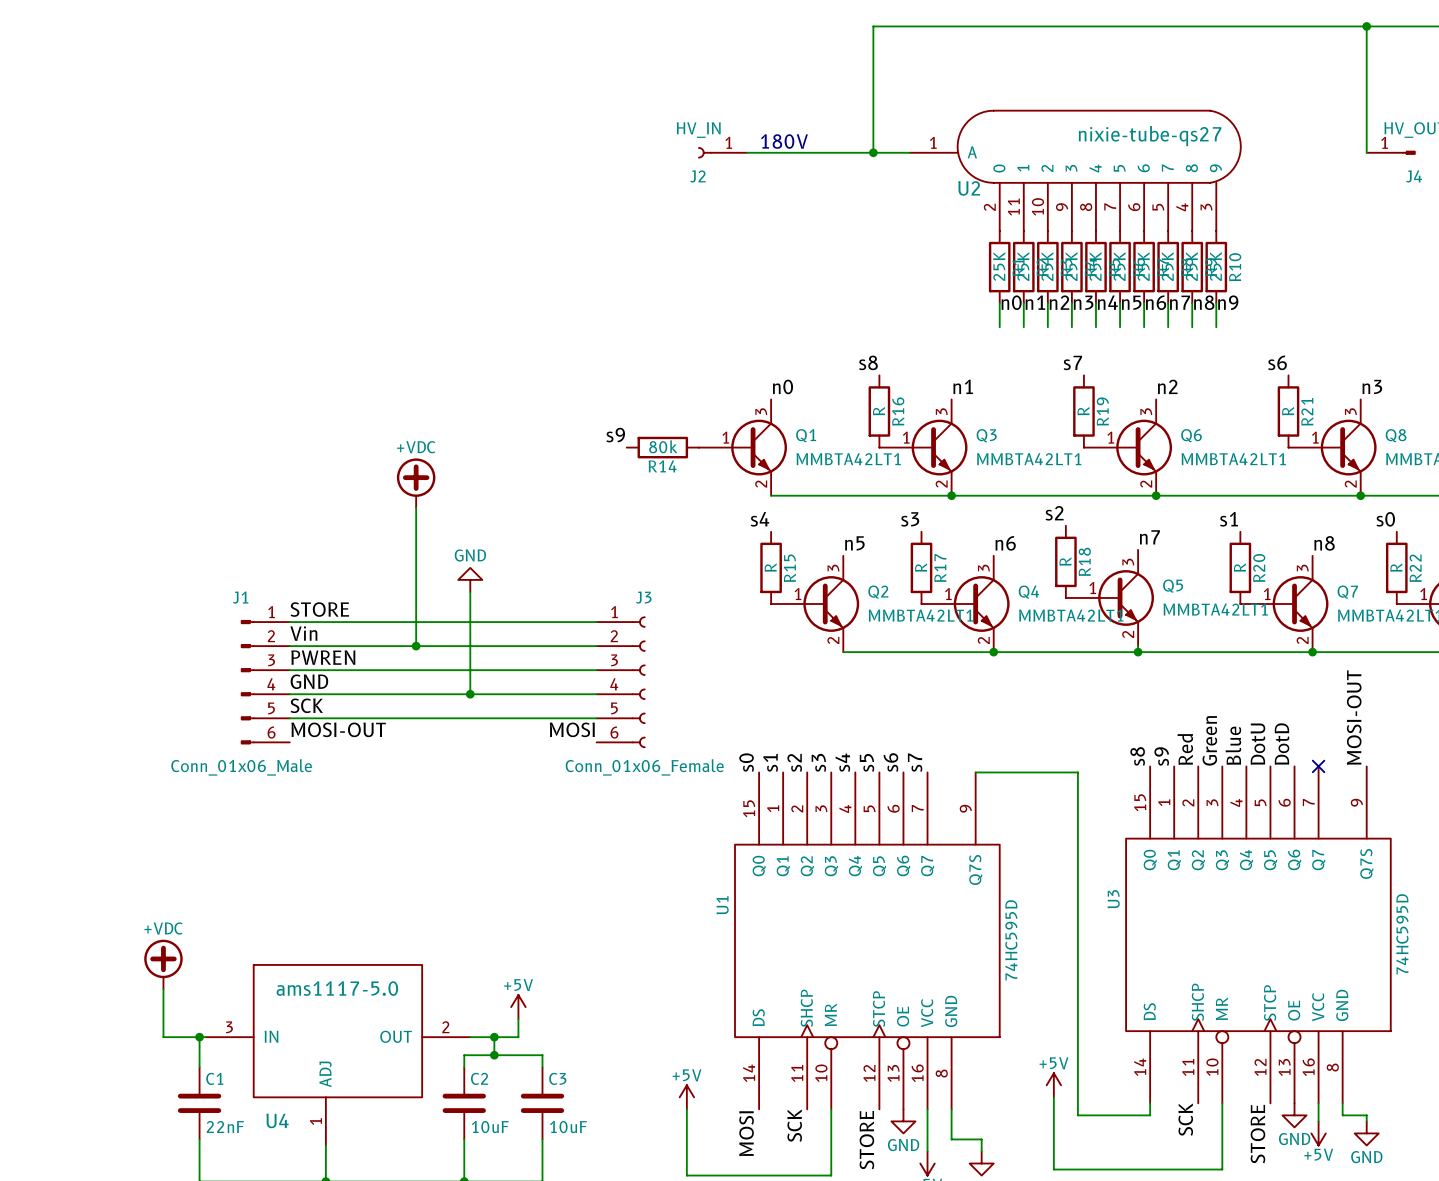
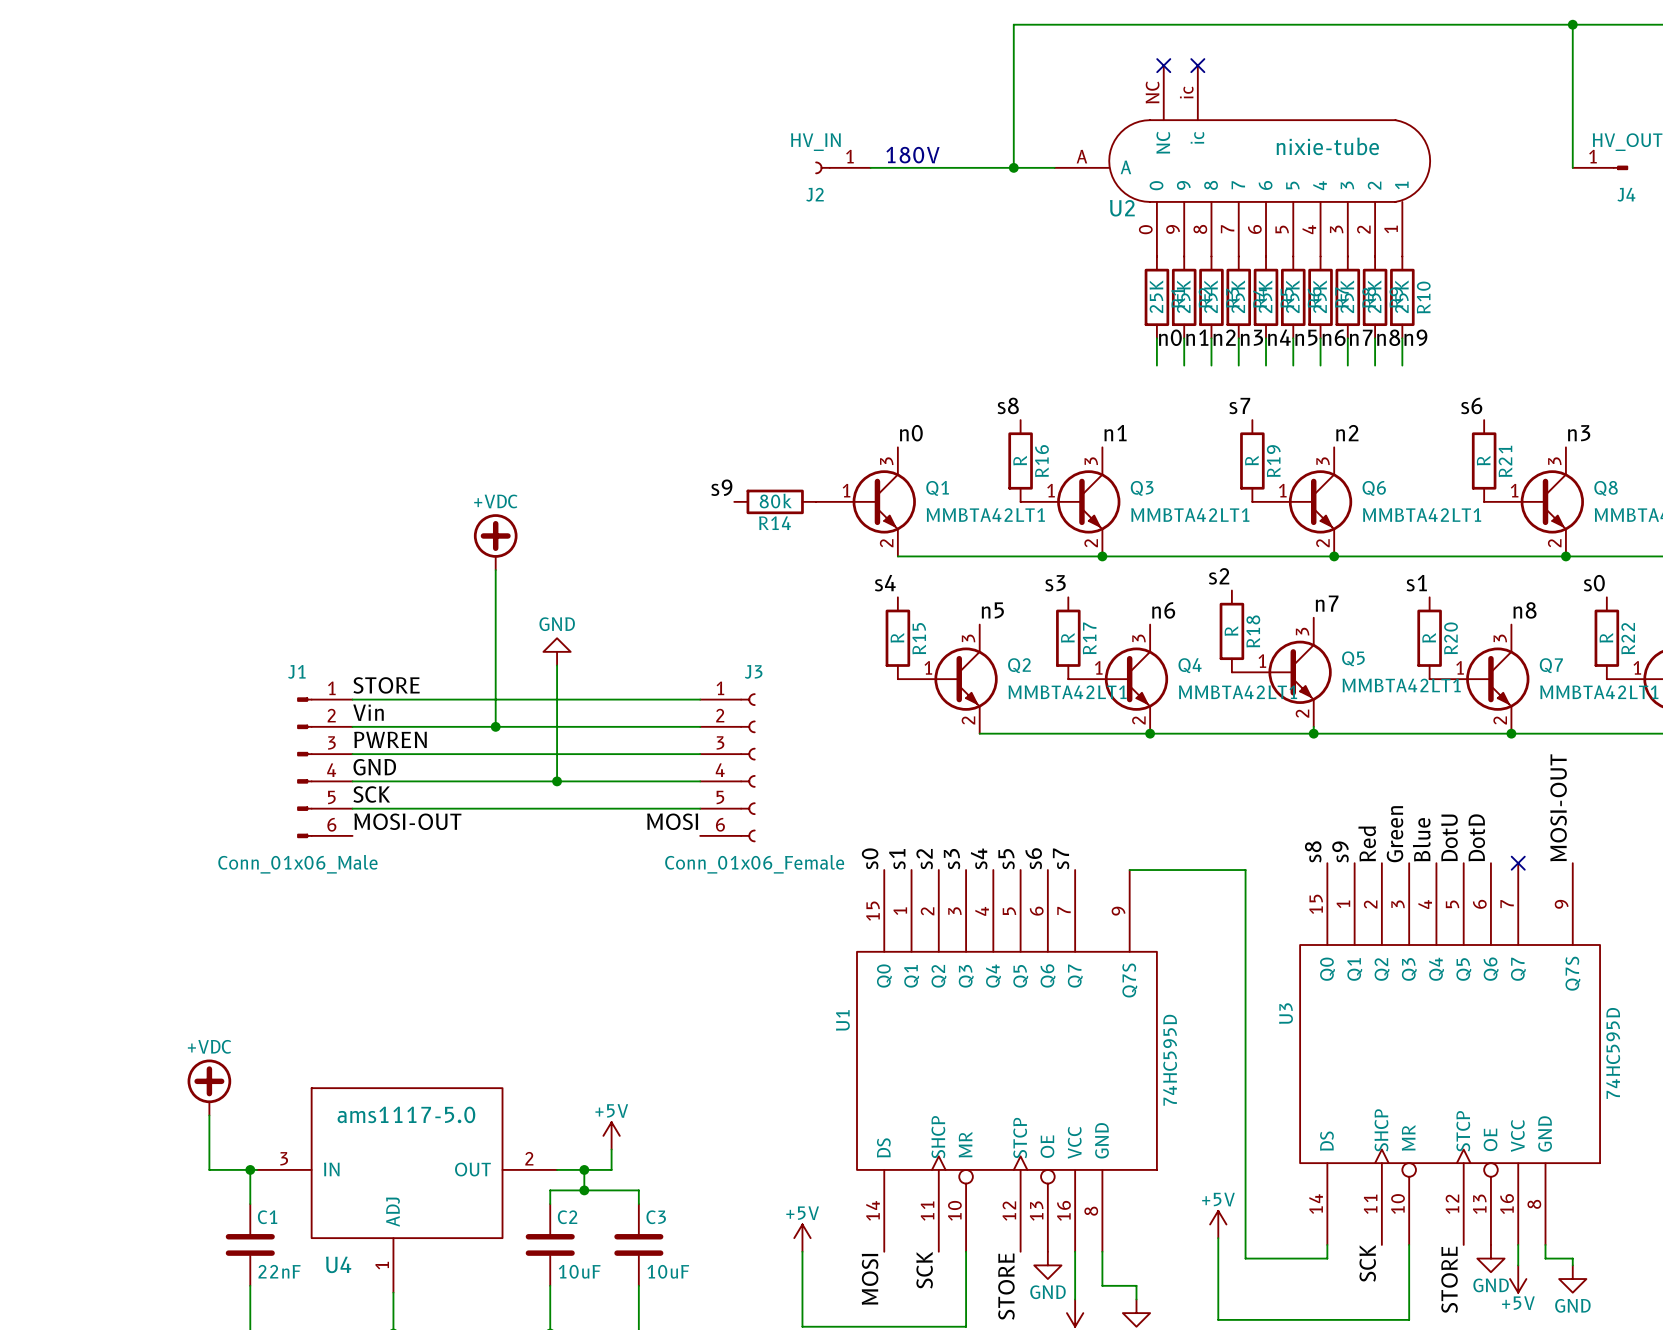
no-connect mark: none -> (1163, 65)
no-connect mark: none -> (1197, 65)
U2 symbol: [909, 110, 1241, 231] -> [1054, 65, 1431, 257]
U2 value: nixie-tube-qs27 (1150, 136) -> nixie-tube (1327, 146)

